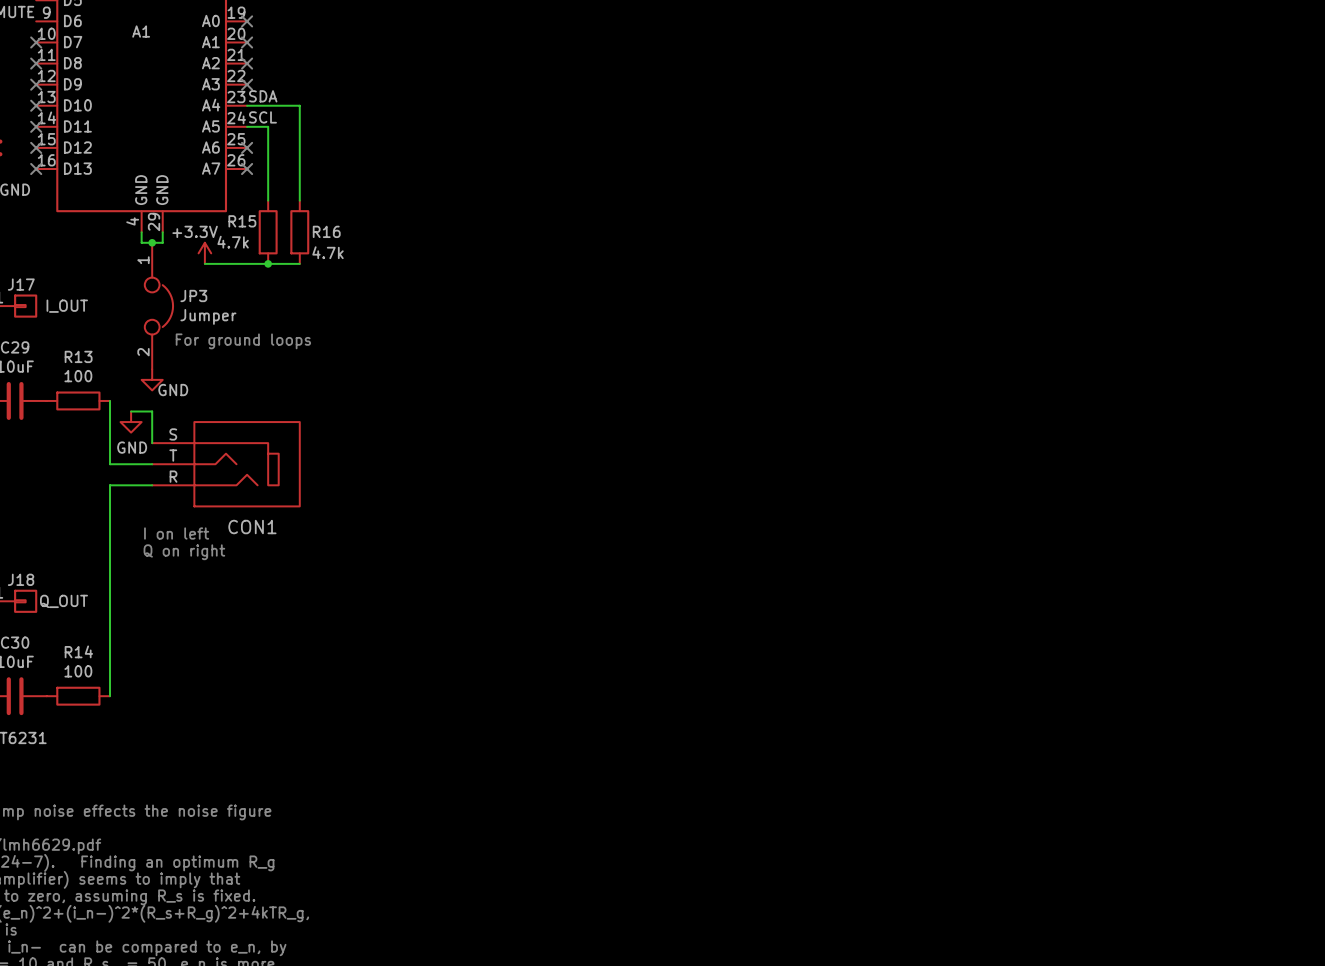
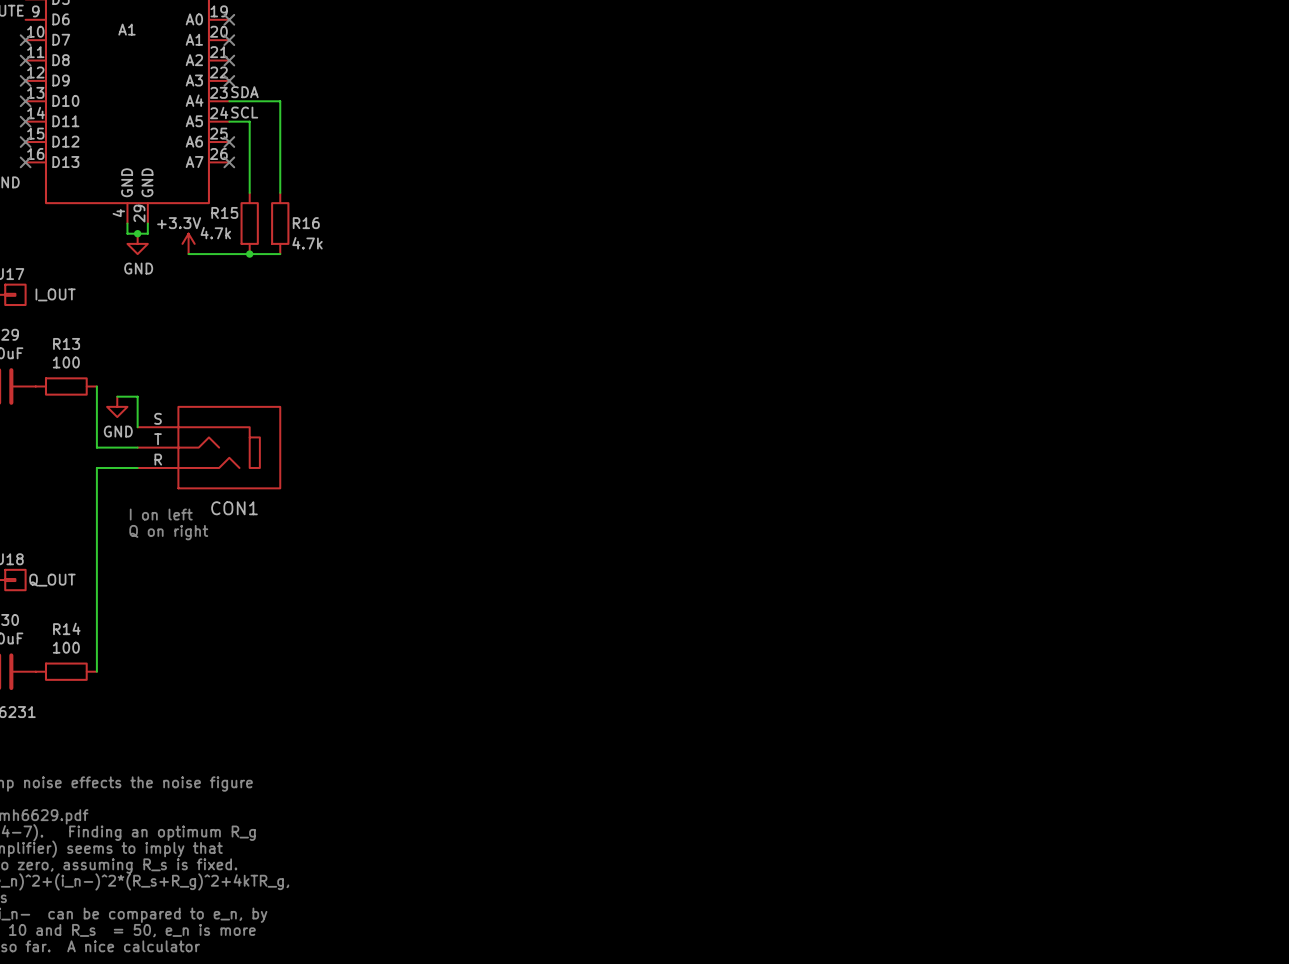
JP3: Jumper (158, 306) -> none
text: For ground loops (243, 341) -> none
power symbol position: GND (152, 379) -> GND (137, 243)
power symbol text position: GND (173, 390) -> GND (138, 268)

